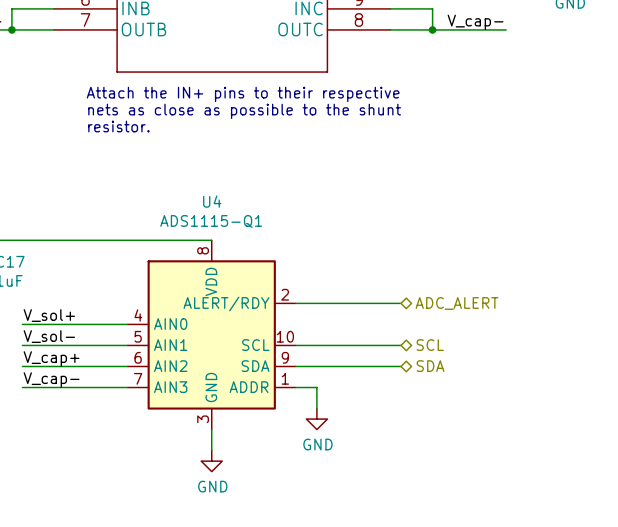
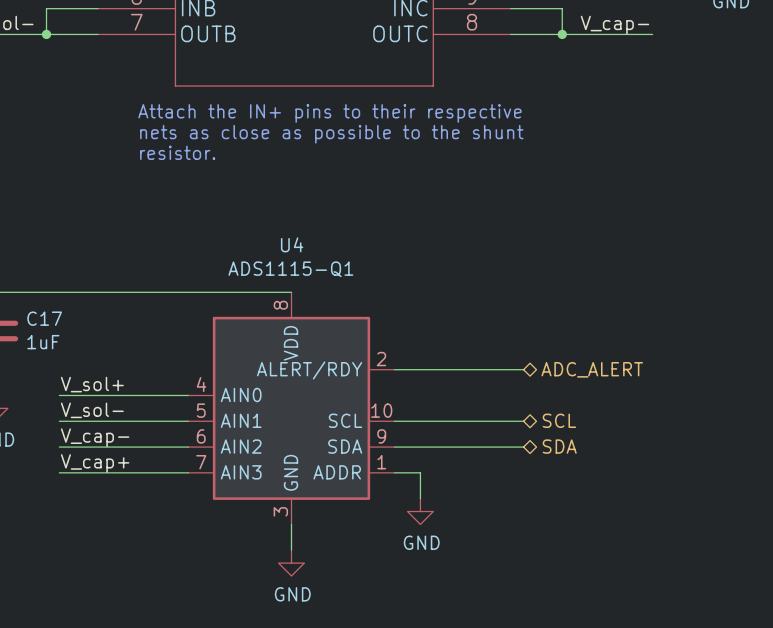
label: V_cap+ (51, 358) -> V_cap- (95, 437)
label: V_cap- (51, 379) -> V_cap+ (95, 463)

